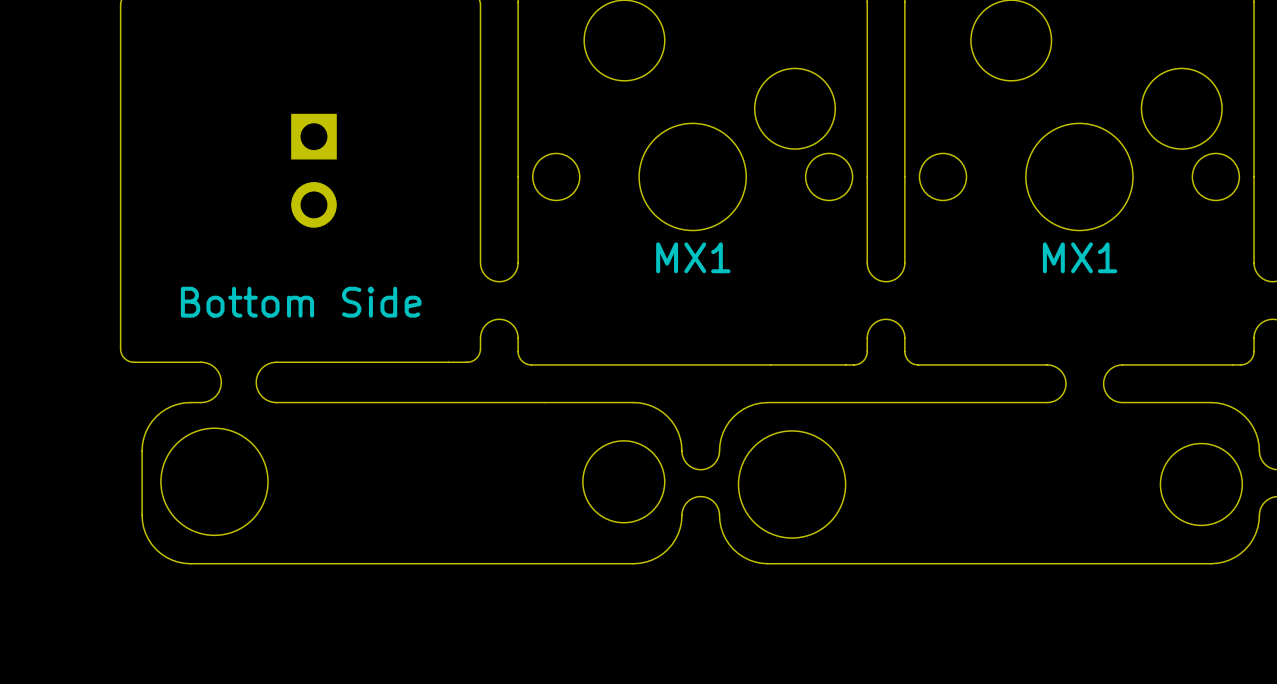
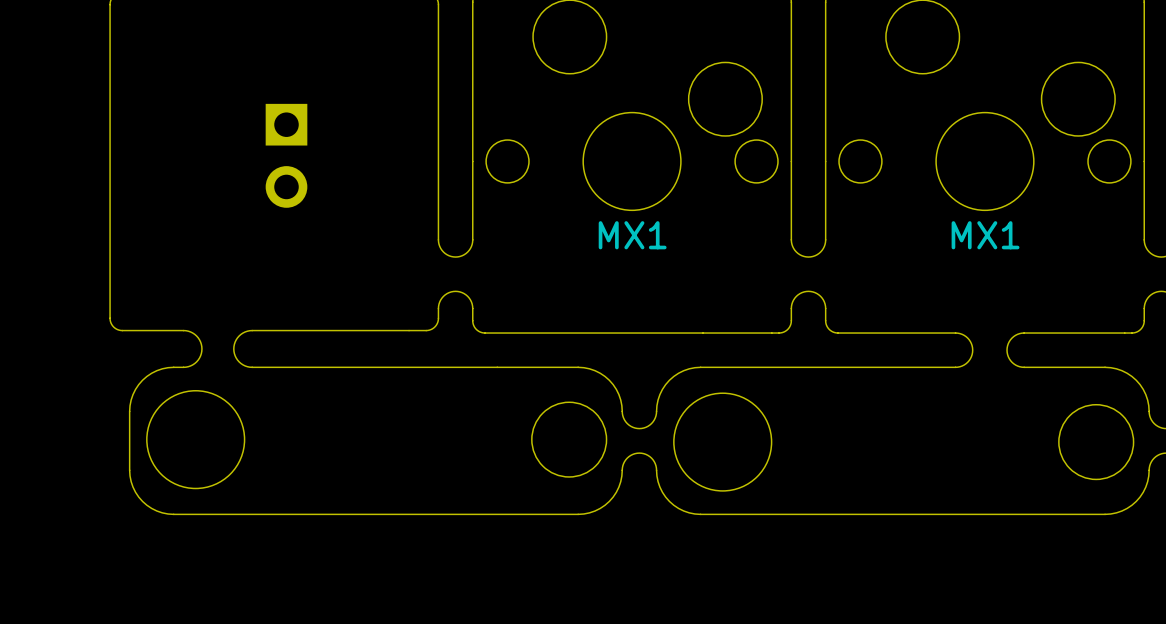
text: Bottom Side (301, 302) -> none

